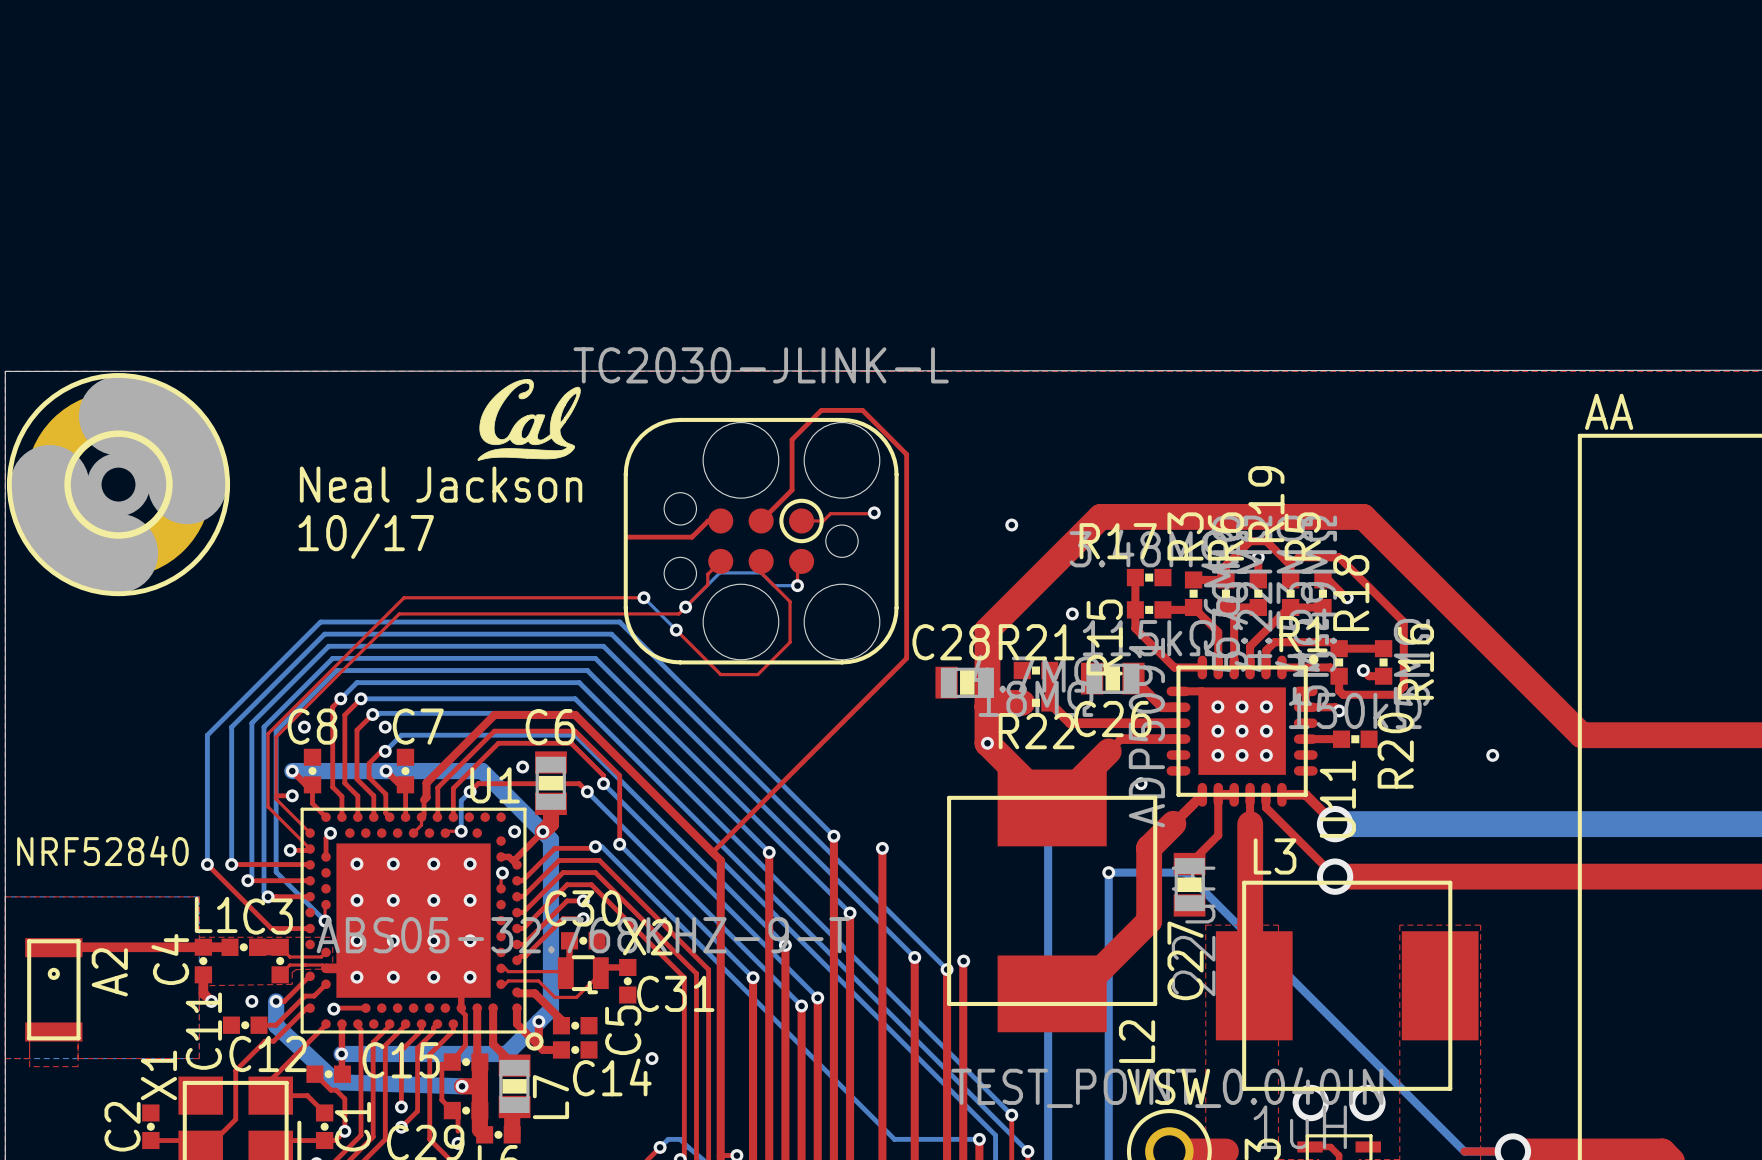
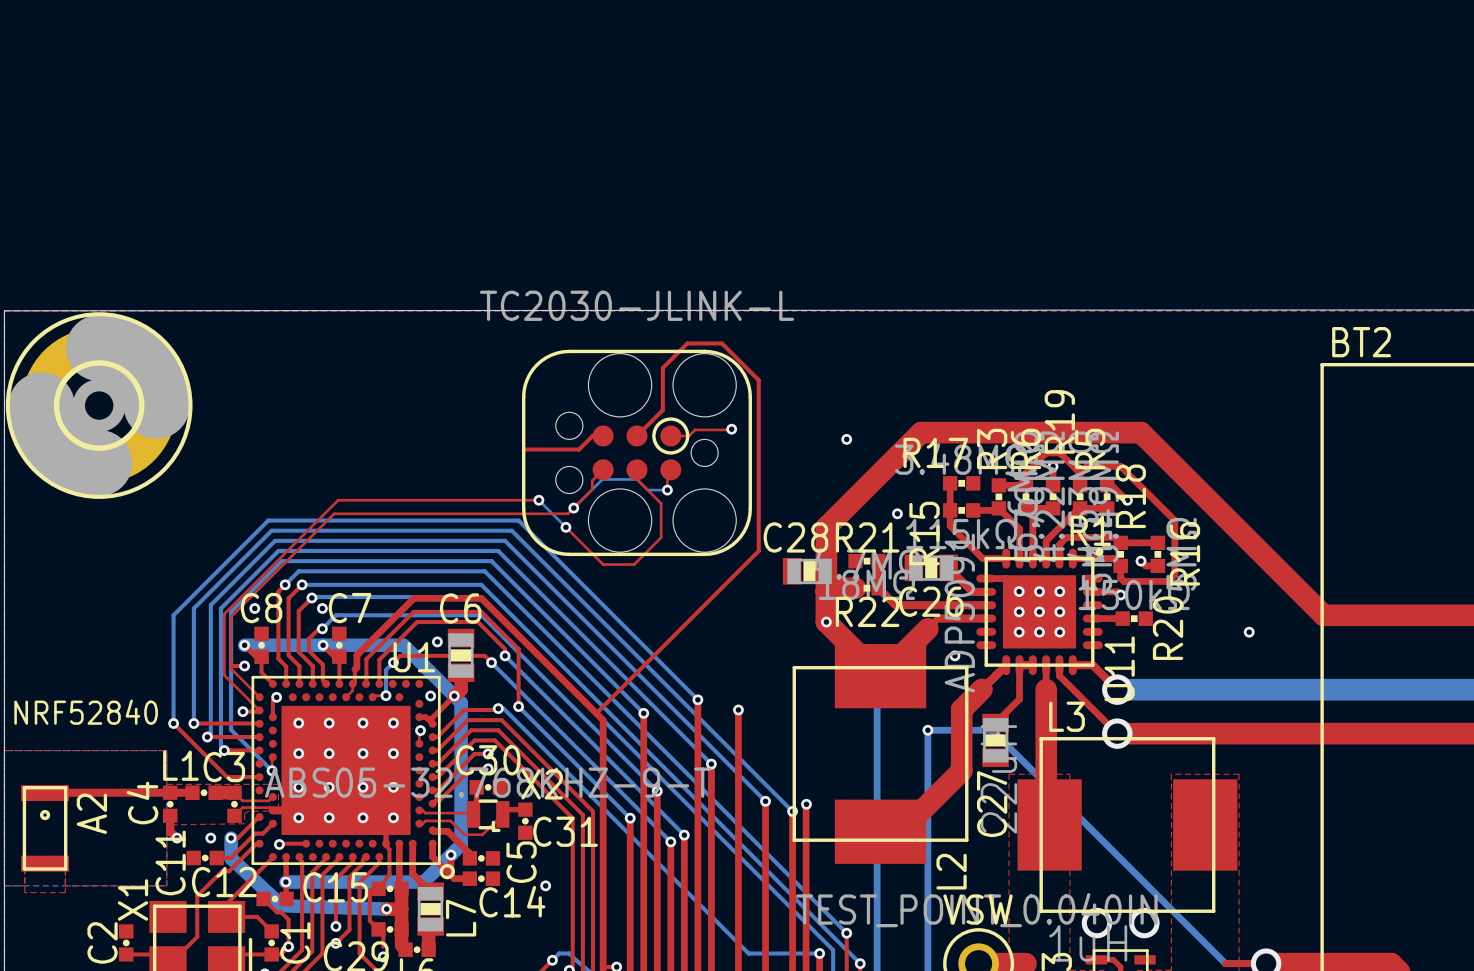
drawing: [477, 378, 581, 461] -> none
BT2 name: none -> BT2 (1361, 342)
text: AA (1609, 411) -> none
text: Neal Jackson (441, 484) -> none
text: 10/17 (366, 536) -> none

